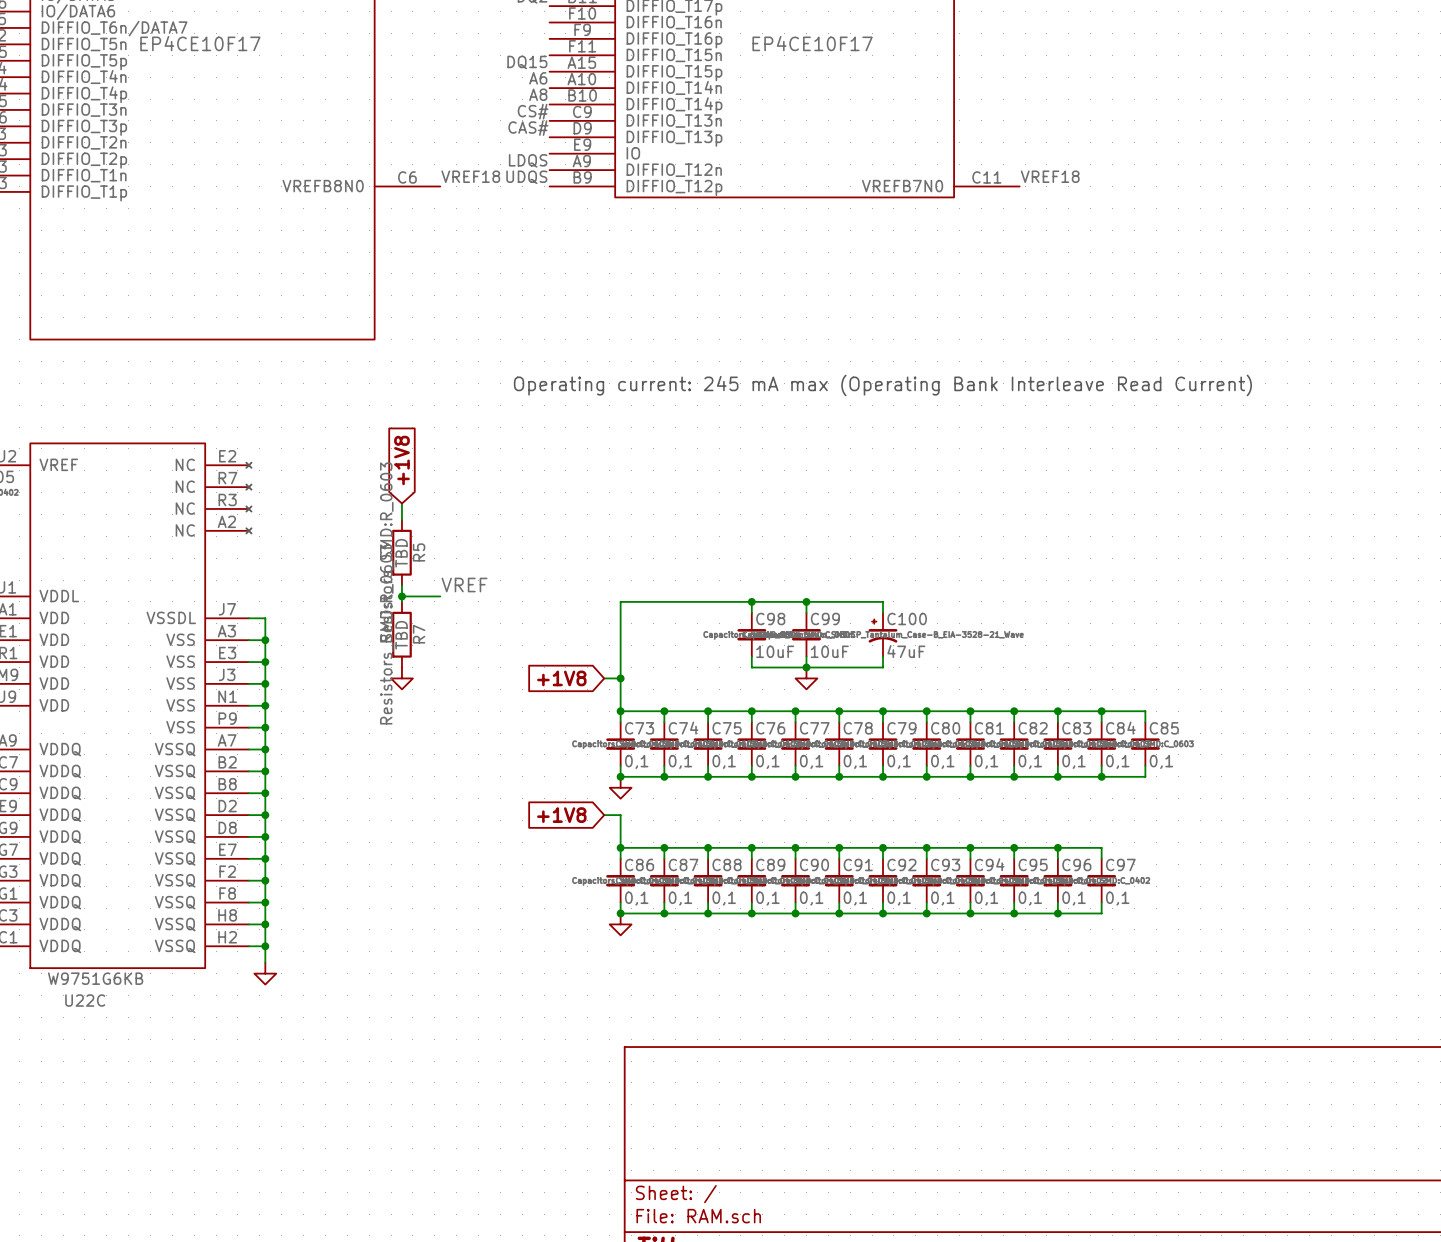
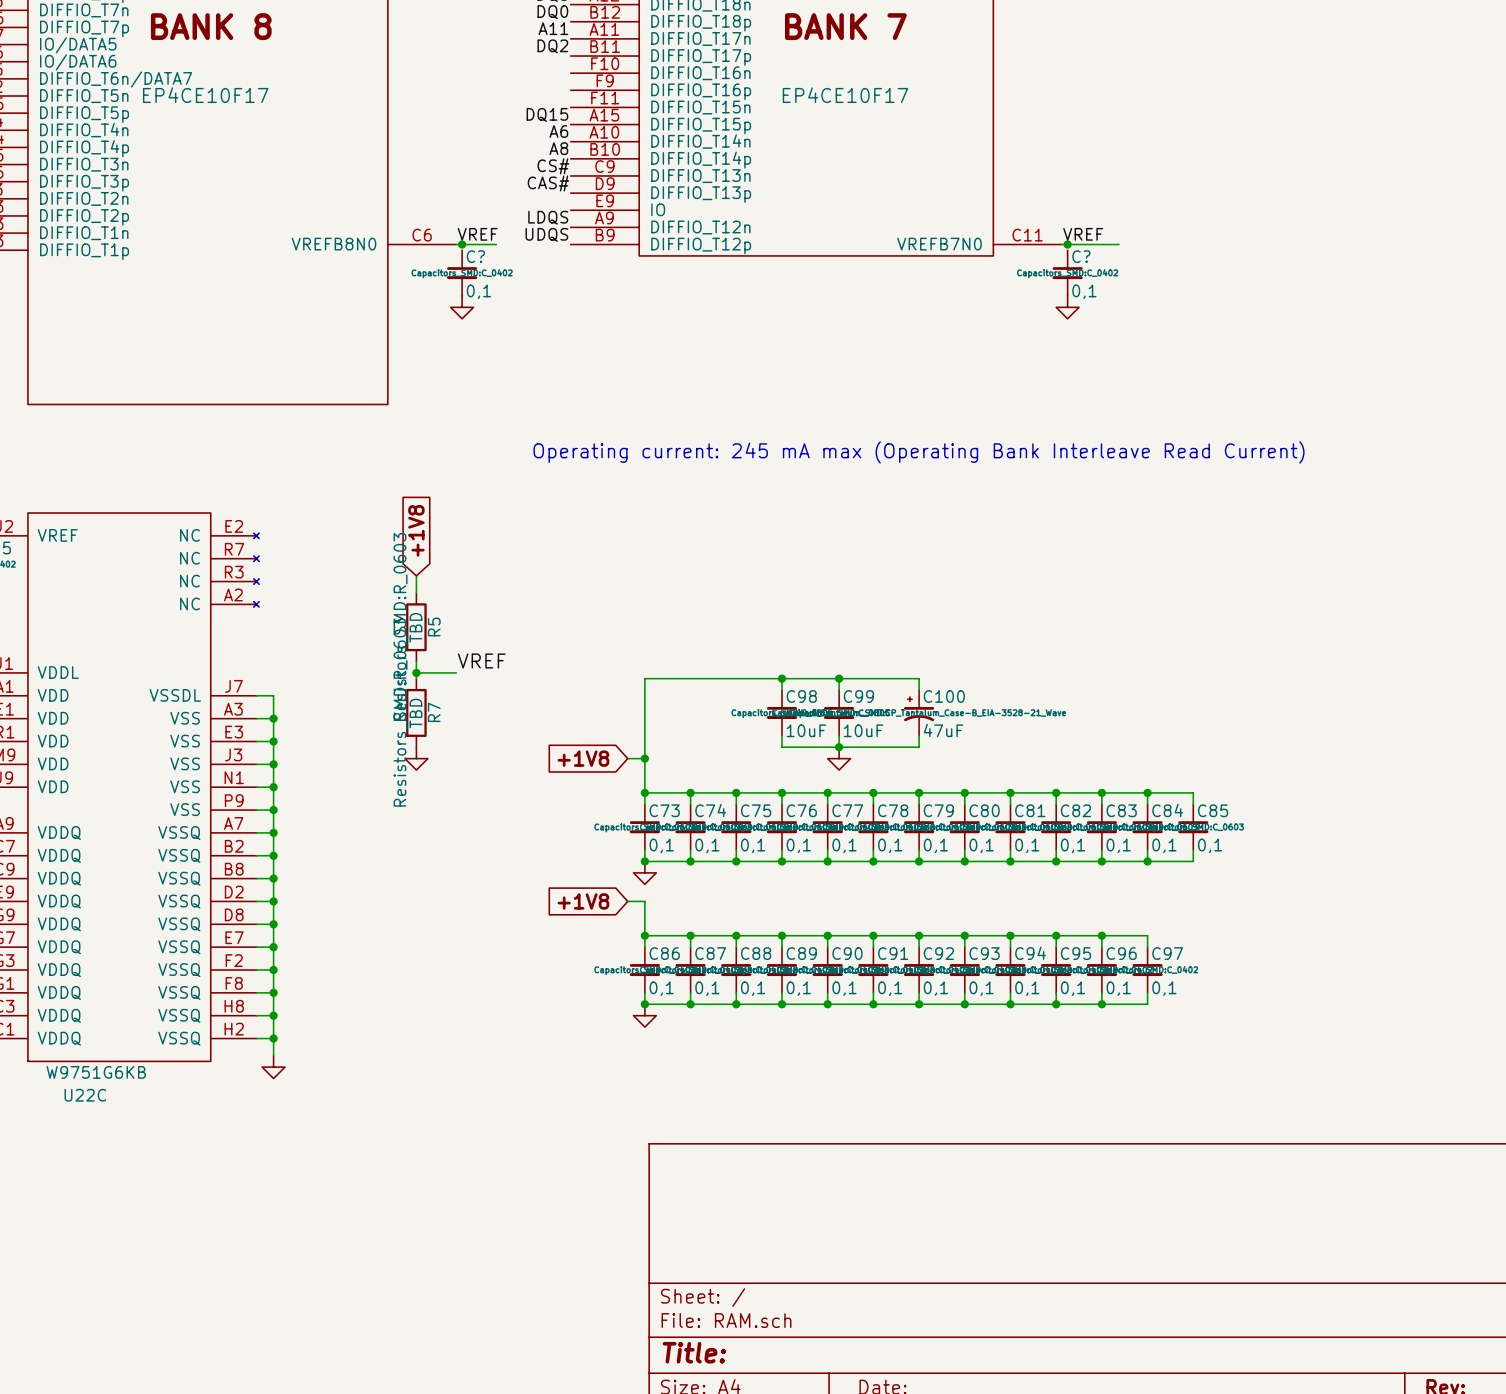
label: VREF18 (470, 176) -> VREF (477, 234)
label: VREF18 (1050, 176) -> VREF (1083, 234)
wire: none -> (456, 244) (496, 244)
junction: none -> (462, 244)
wire: none -> (1061, 244) (1119, 244)
junction: none -> (1067, 244)
C?: none -> 0,1 (462, 273)
C?: none -> 0,1 (1067, 273)
power symbol: none -> (462, 307)
power symbol: none -> (1067, 307)

